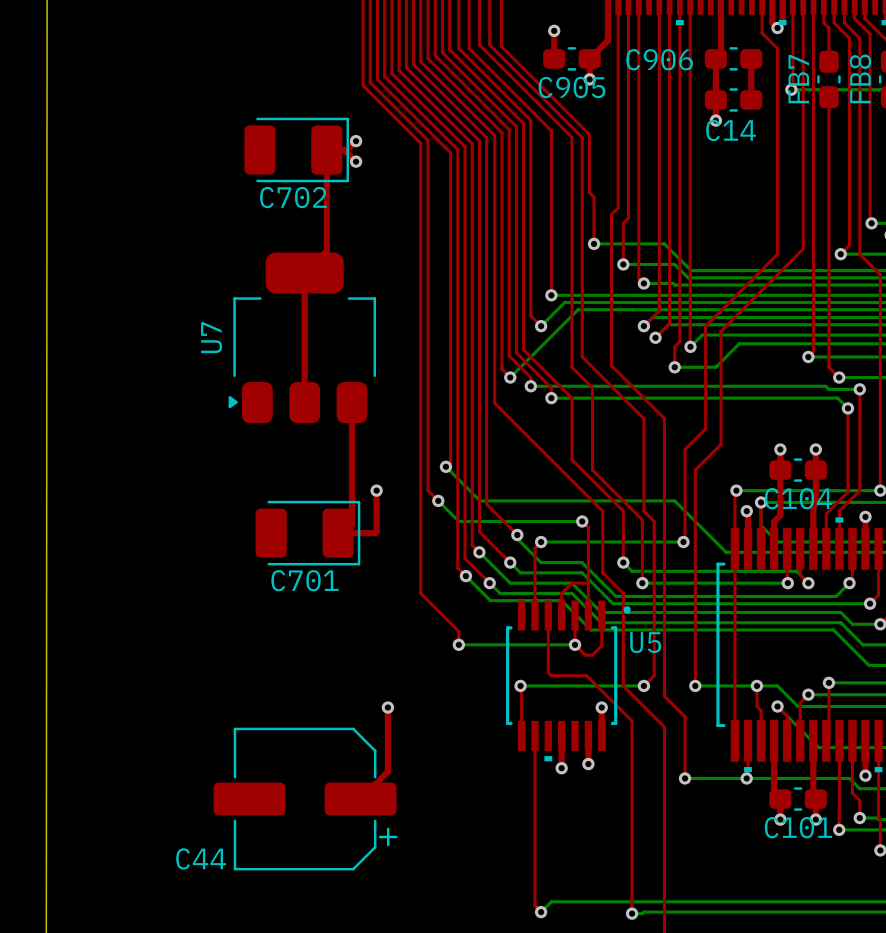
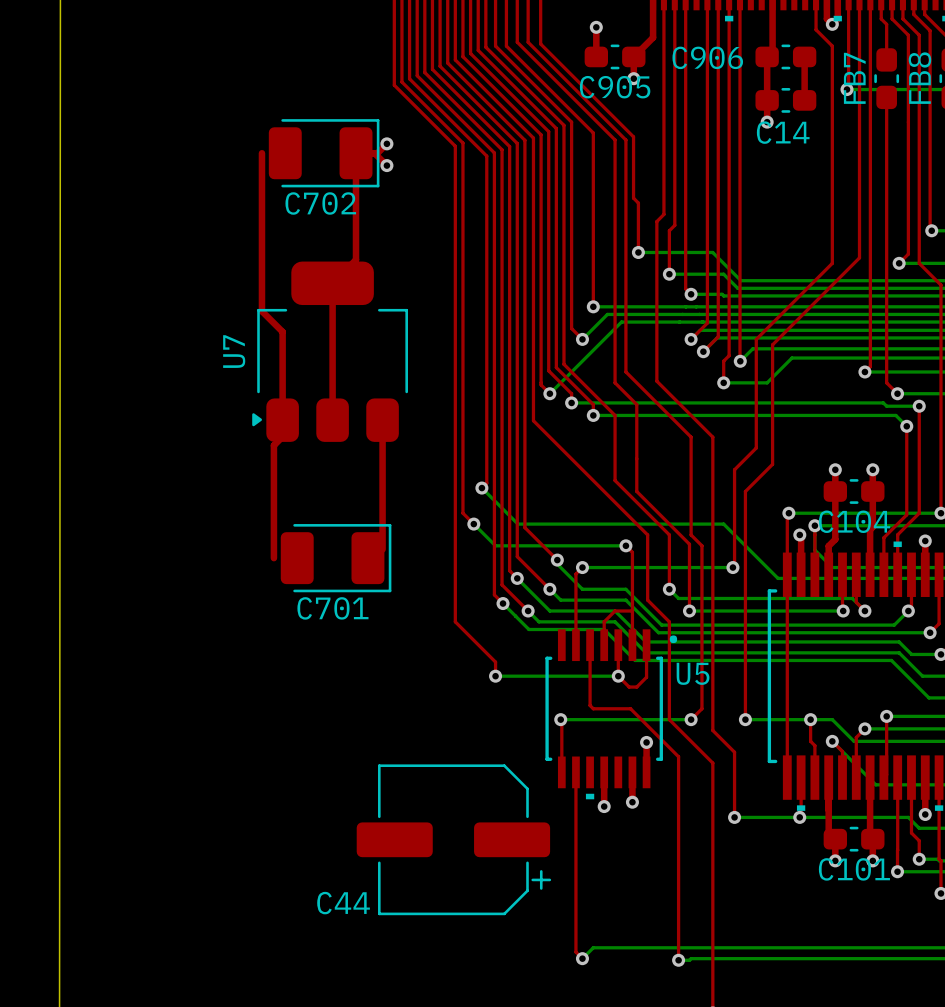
top track: none -> (261, 153) (261, 311) (282, 331) (282, 436) (273, 445) (273, 558)
top track: (376, 490) (376, 531) (338, 533) -> none
via: (376, 490) -> none
top track: (387, 707) (387, 771) (360, 799) -> none
via: (387, 707) -> none
C44 position: (305, 799) -> (453, 839)

